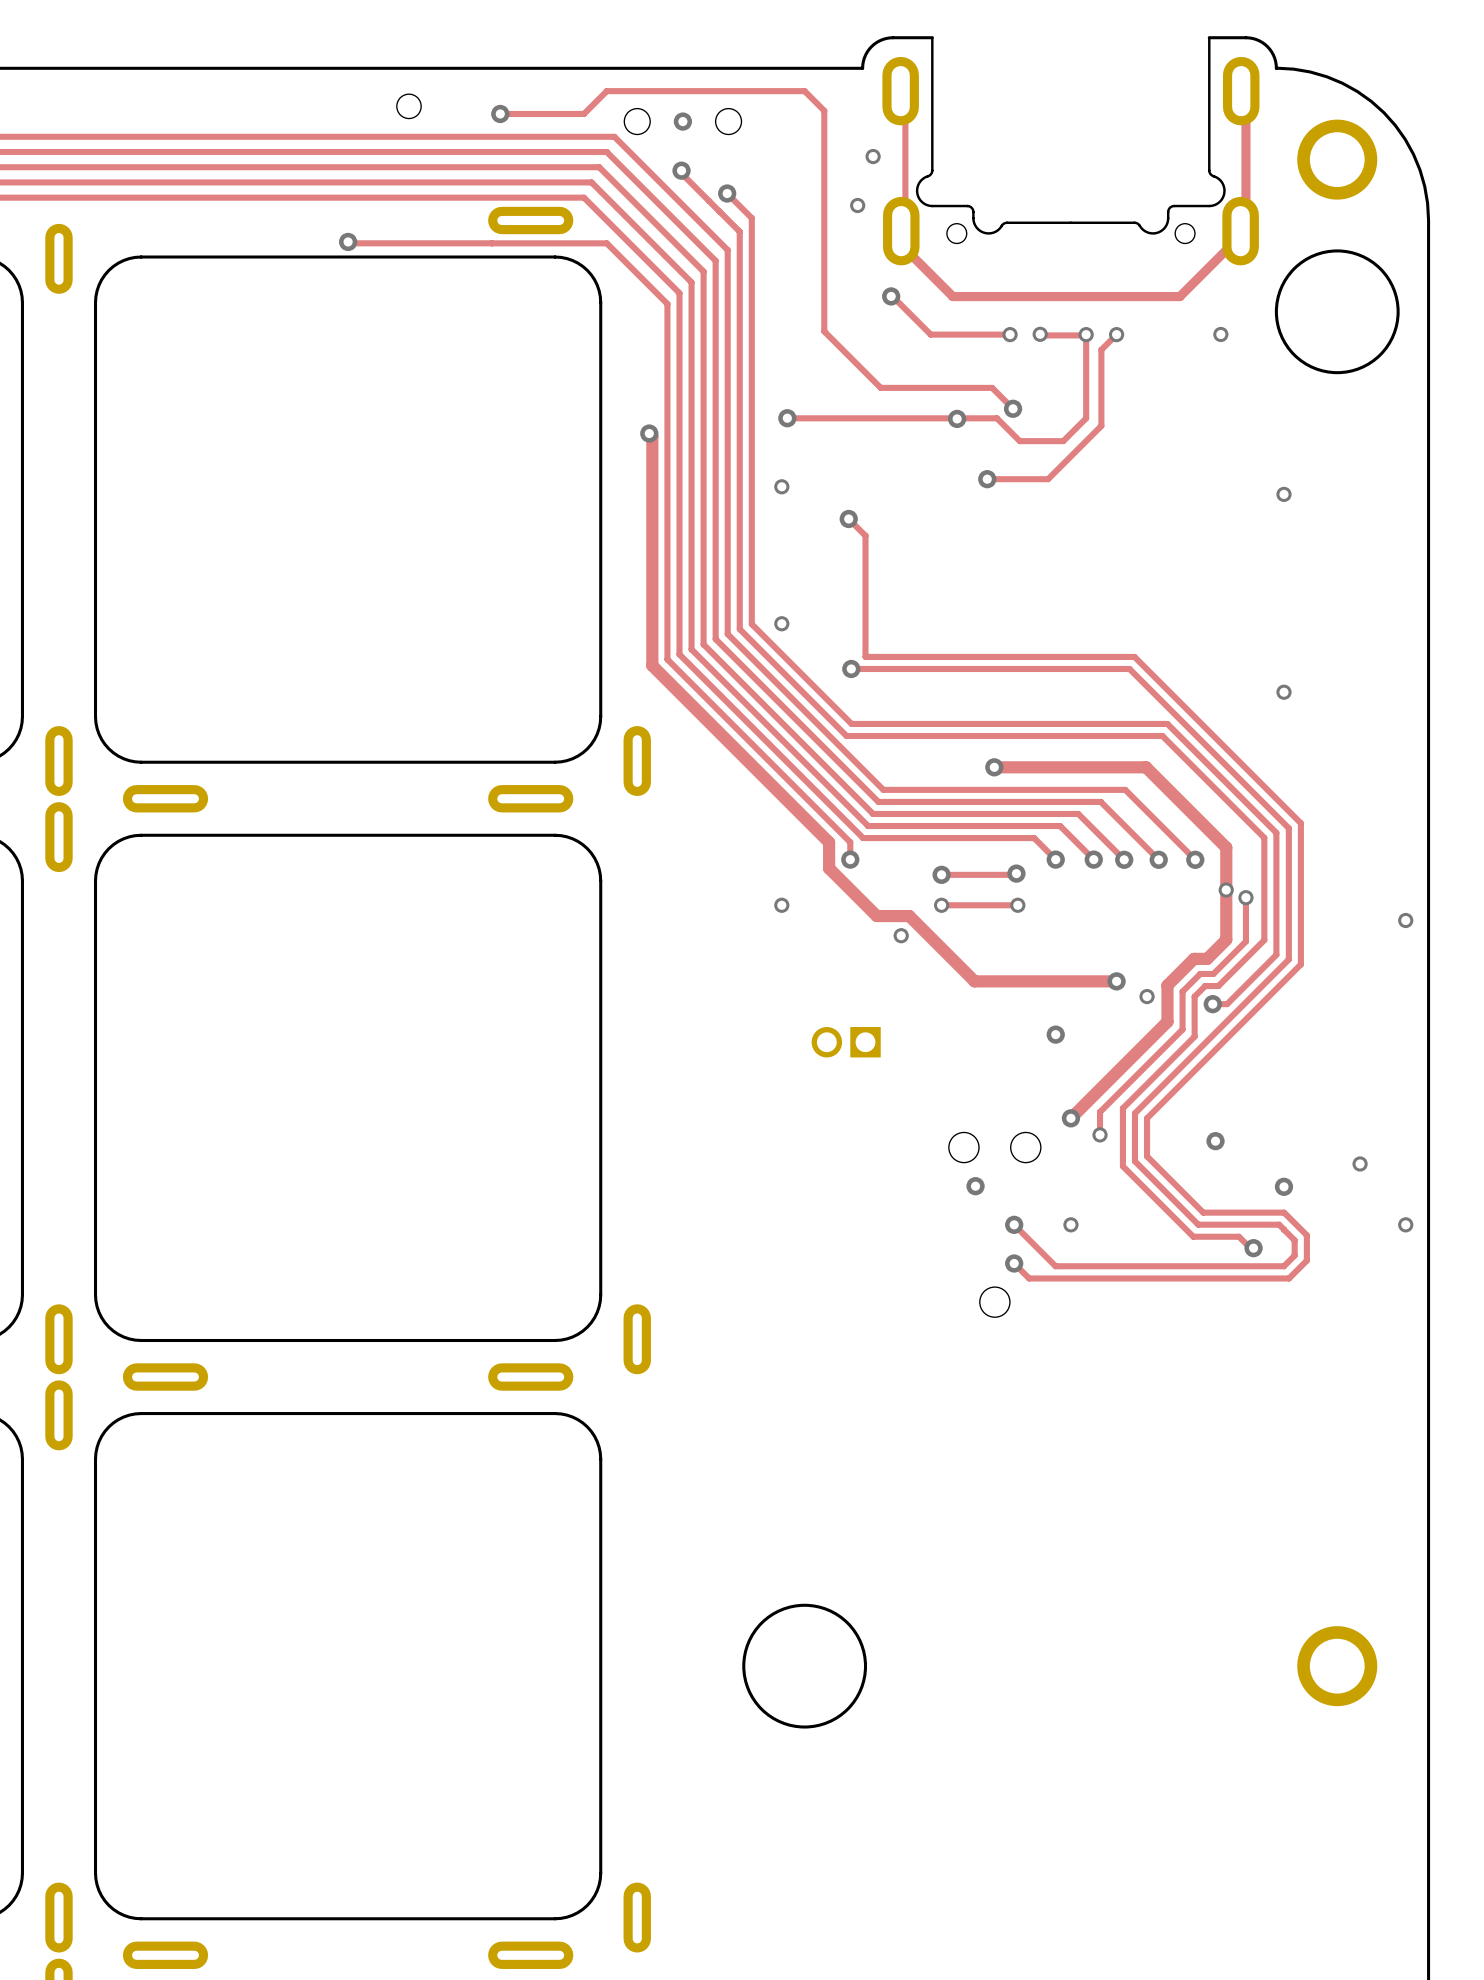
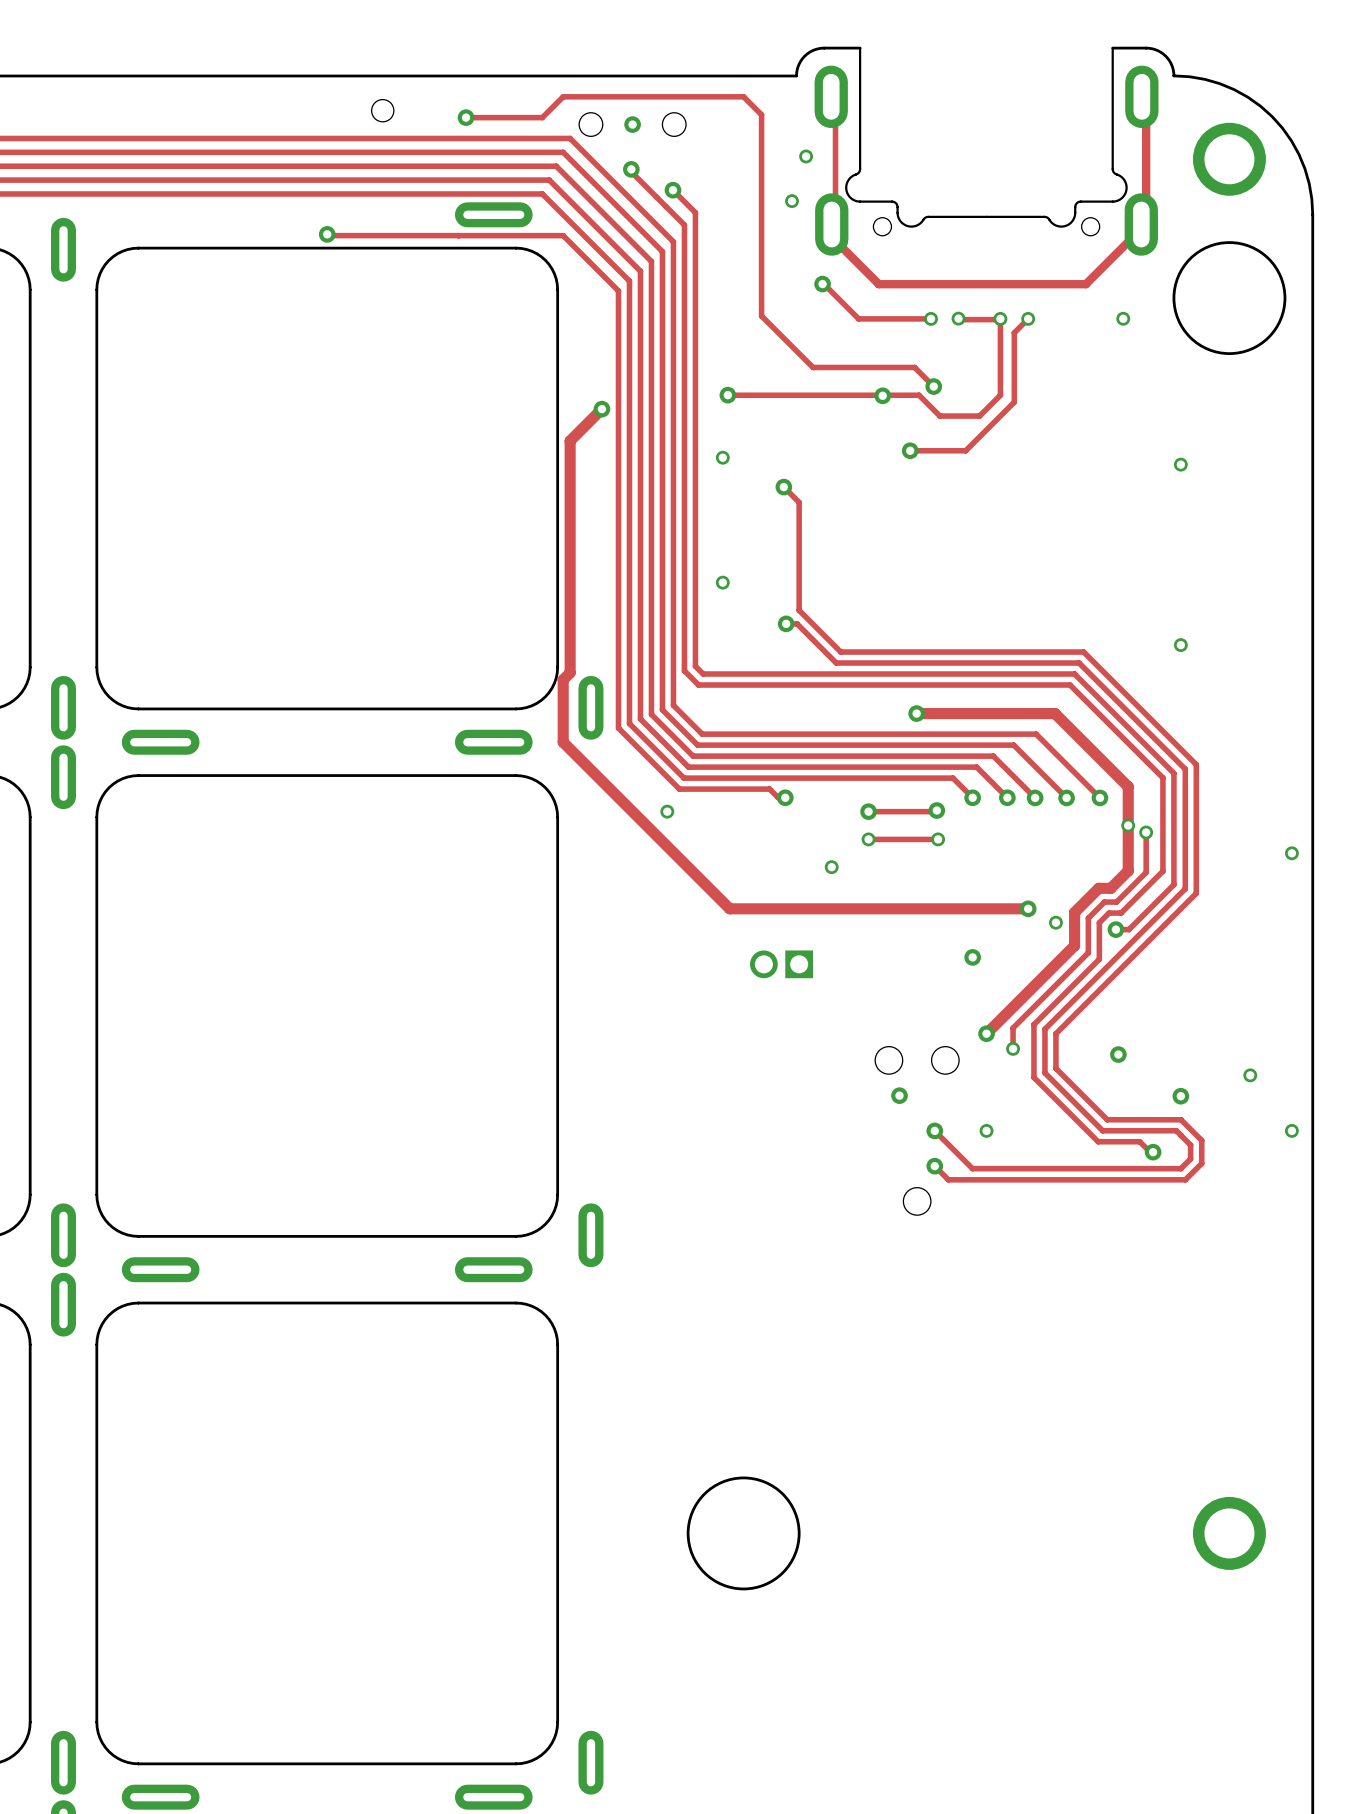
track: (649, 433) (652, 436) (652, 665) (829, 842) (829, 868) (876, 916) (909, 916) (974, 981) -> (601, 409) (570, 440) (570, 672) (563, 679) (563, 742) (729, 908) (898, 908)
track: (751, 624) (851, 723) -> (695, 583) (695, 666) (703, 674) (786, 674)
track: (739, 629) (846, 735) -> (684, 587) (684, 670) (698, 685) (781, 685)
track: (727, 634) (883, 789) -> (673, 592) (673, 705) (702, 734) (815, 734)
track: (715, 639) (878, 801) -> (662, 596) (662, 709) (697, 745) (810, 745)
track: (703, 644) (873, 813) -> (651, 601) (651, 714) (693, 756) (806, 756)
track: (691, 649) (868, 826) -> (640, 606) (640, 719) (688, 767) (801, 767)
track: (679, 654) (863, 838) -> (629, 610) (629, 723) (684, 778) (796, 778)
track: (865, 654) (865, 656) (1134, 656) (1177, 699) -> (799, 610) (840, 652) (1083, 652)
track: (667, 659) (850, 842) (850, 859) -> (618, 615) (618, 728) (679, 789) (769, 789) (778, 797) (785, 797)
track: (863, 668) (1129, 668) (1172, 711) -> (797, 623) (836, 663) (1079, 663)
via position: (781, 905) -> (667, 811)

